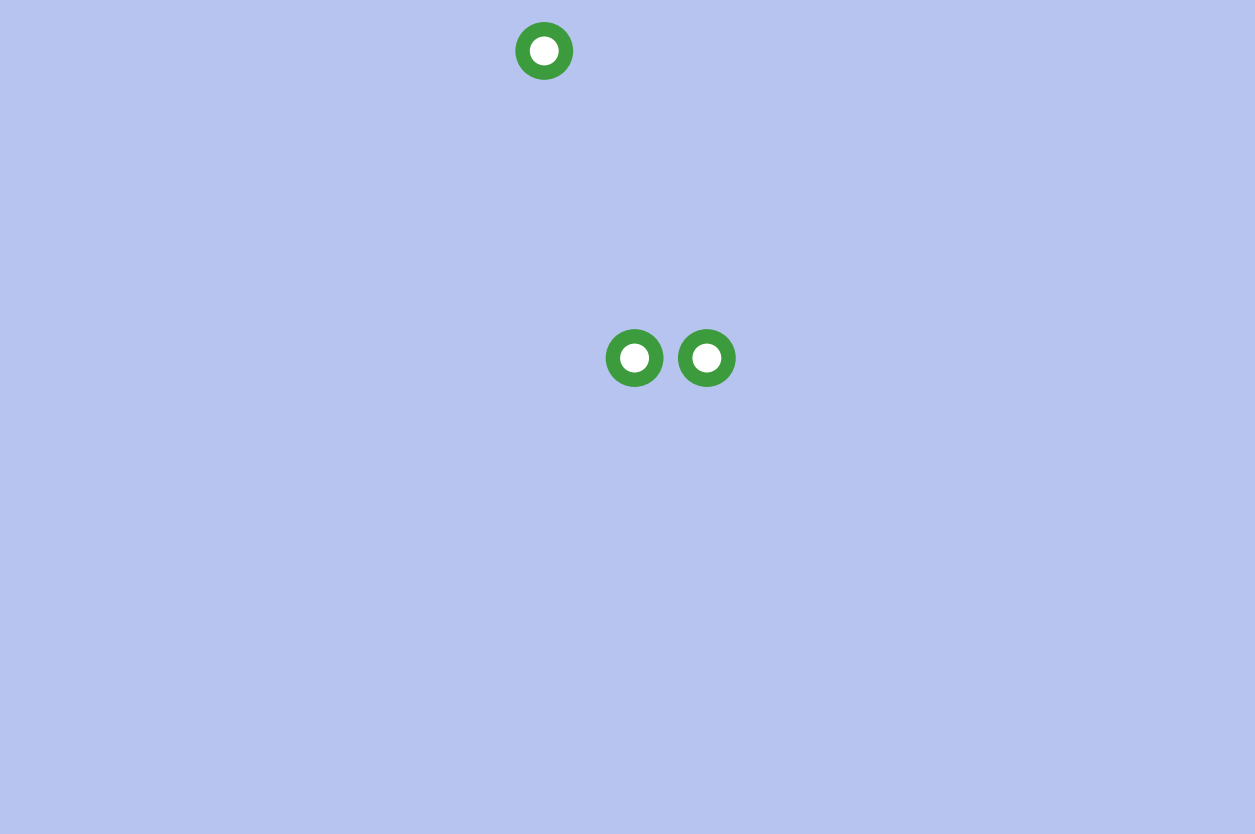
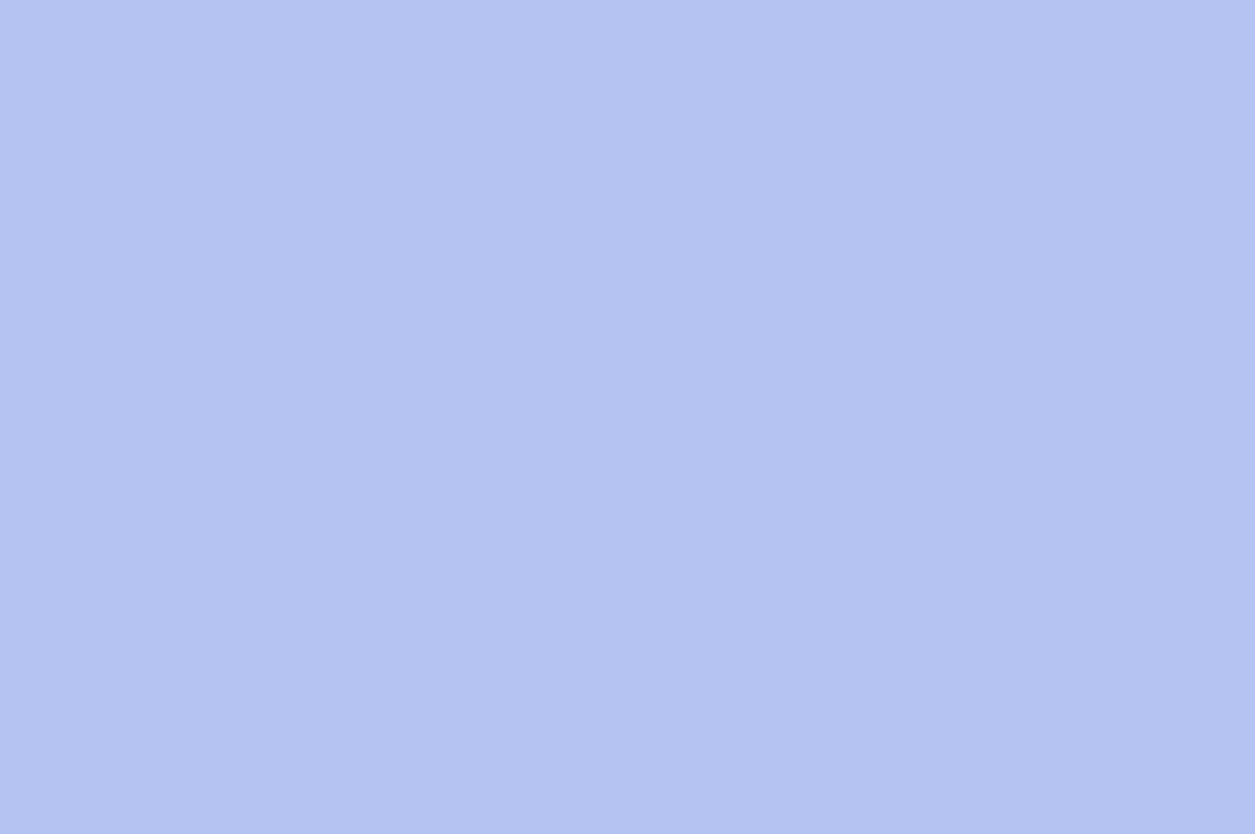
via: (544, 50) -> none
via: (634, 358) -> none
via: (706, 358) -> none

